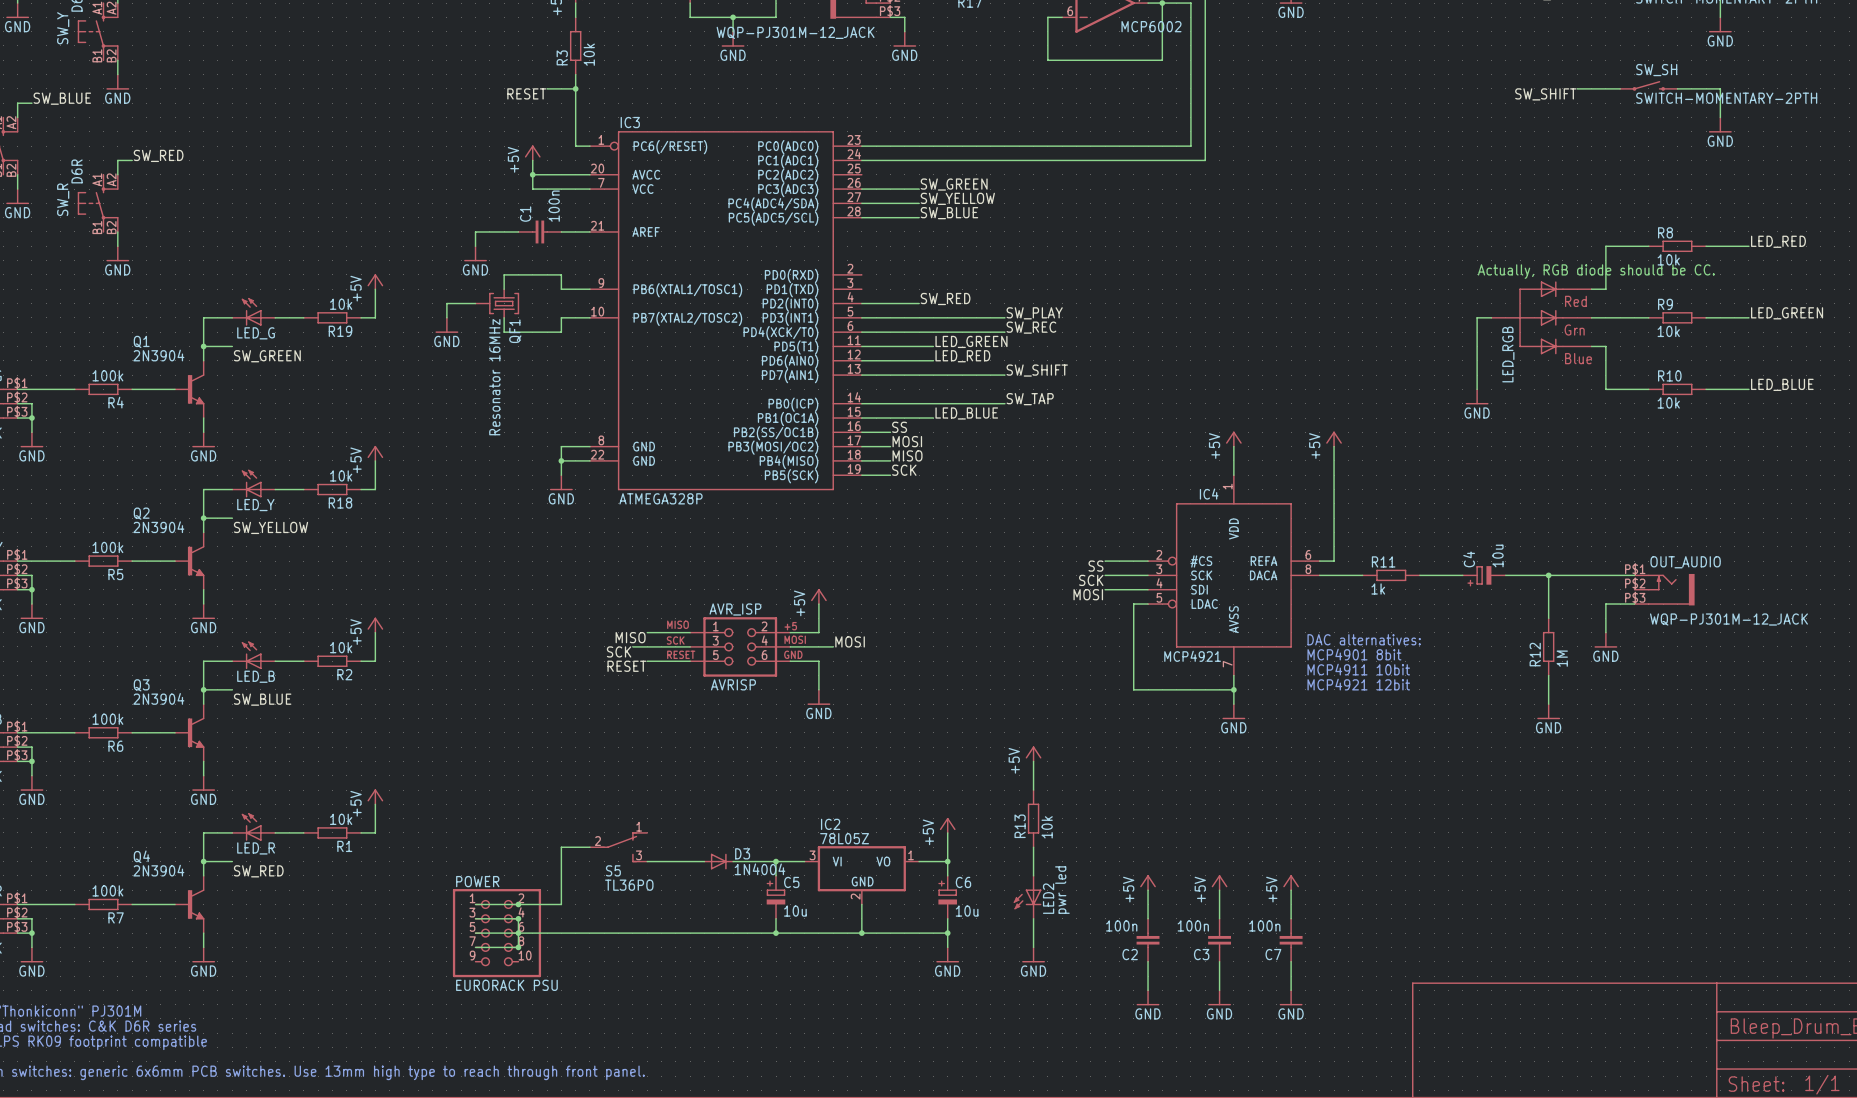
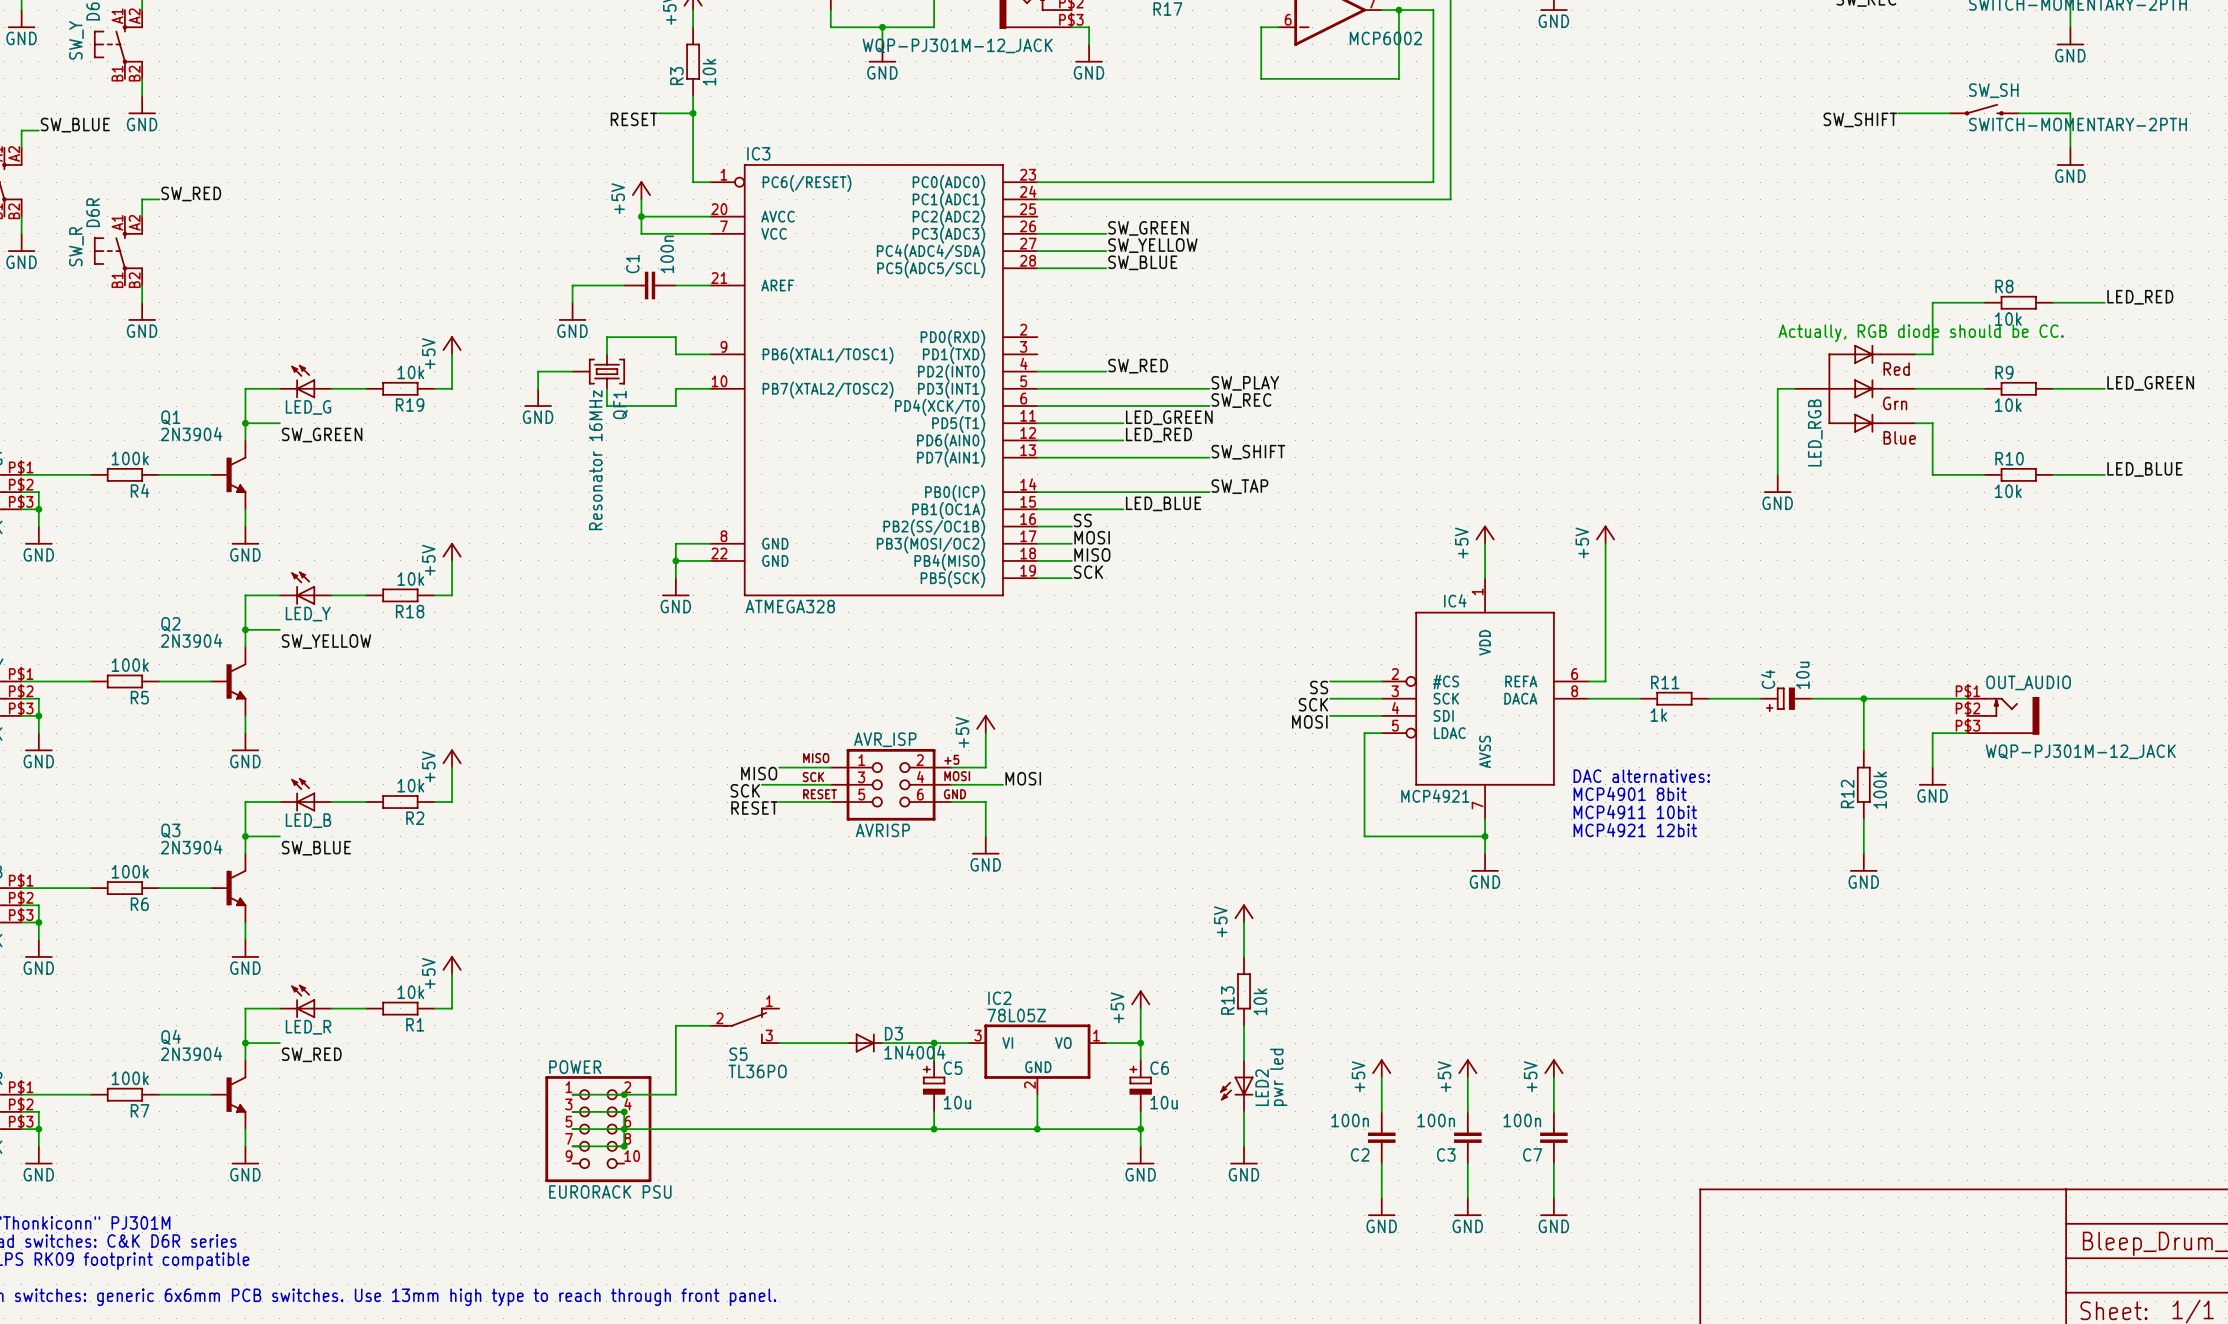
IC3 value: ATMEGA328P (660, 498) -> ATMEGA328 (790, 606)
R12 value: 1M (1562, 658) -> 100k (1880, 790)

